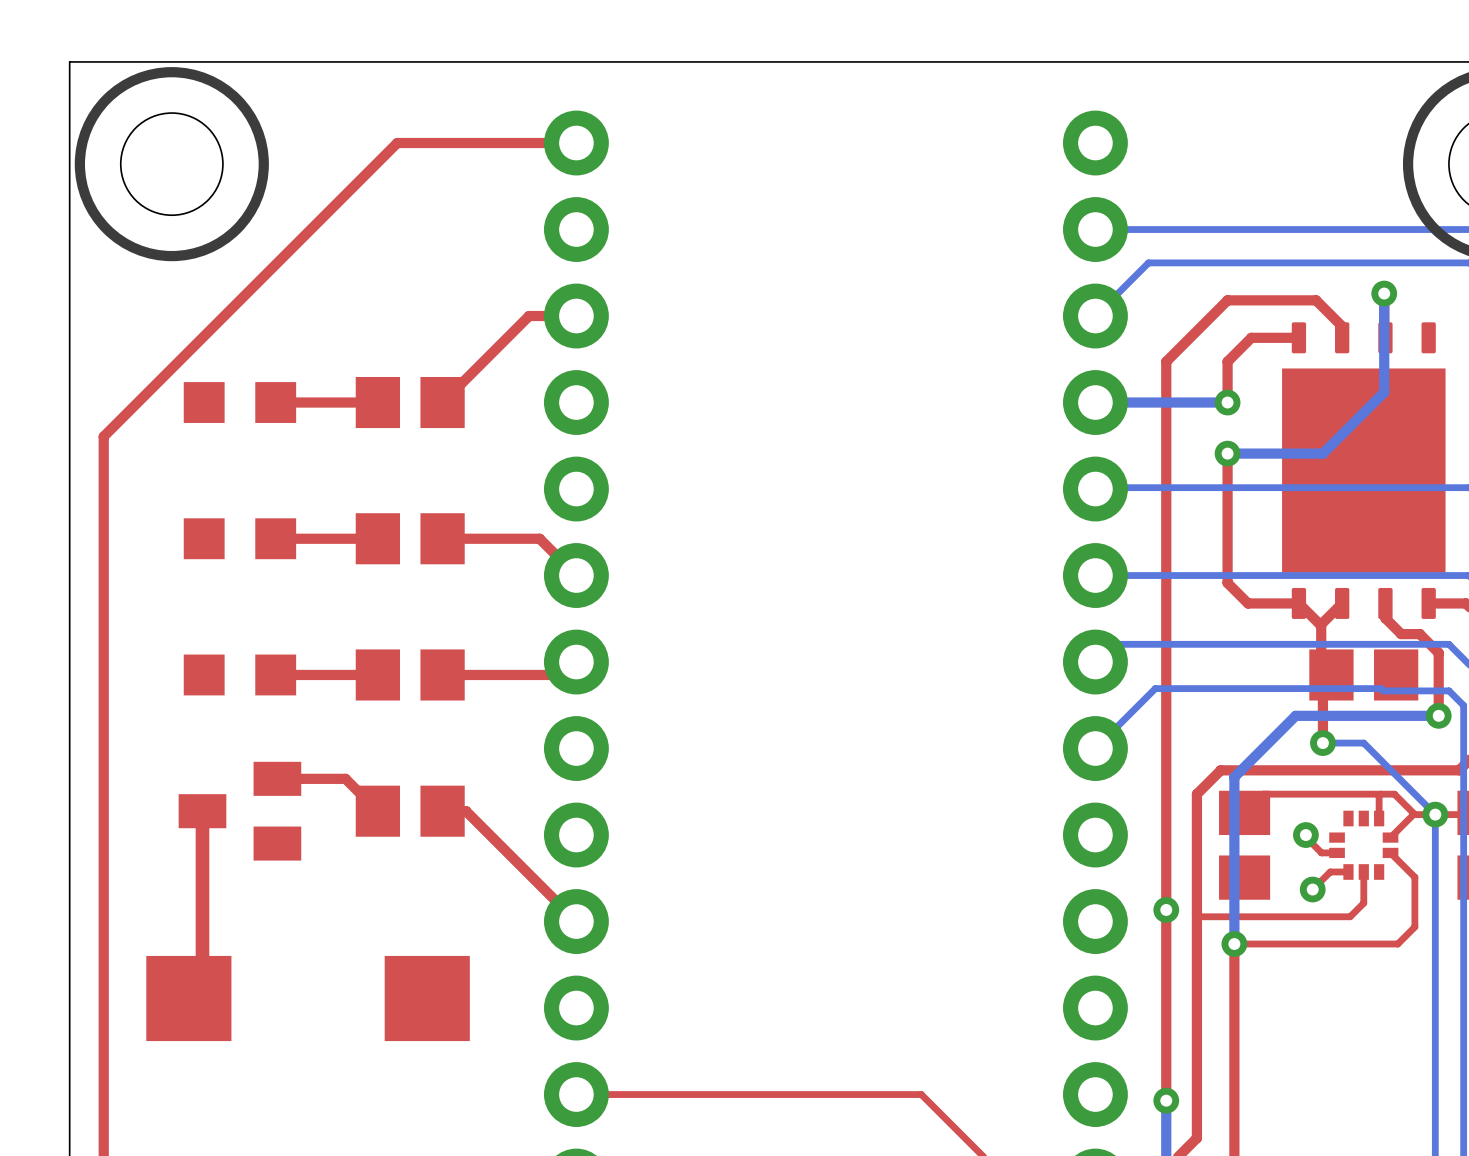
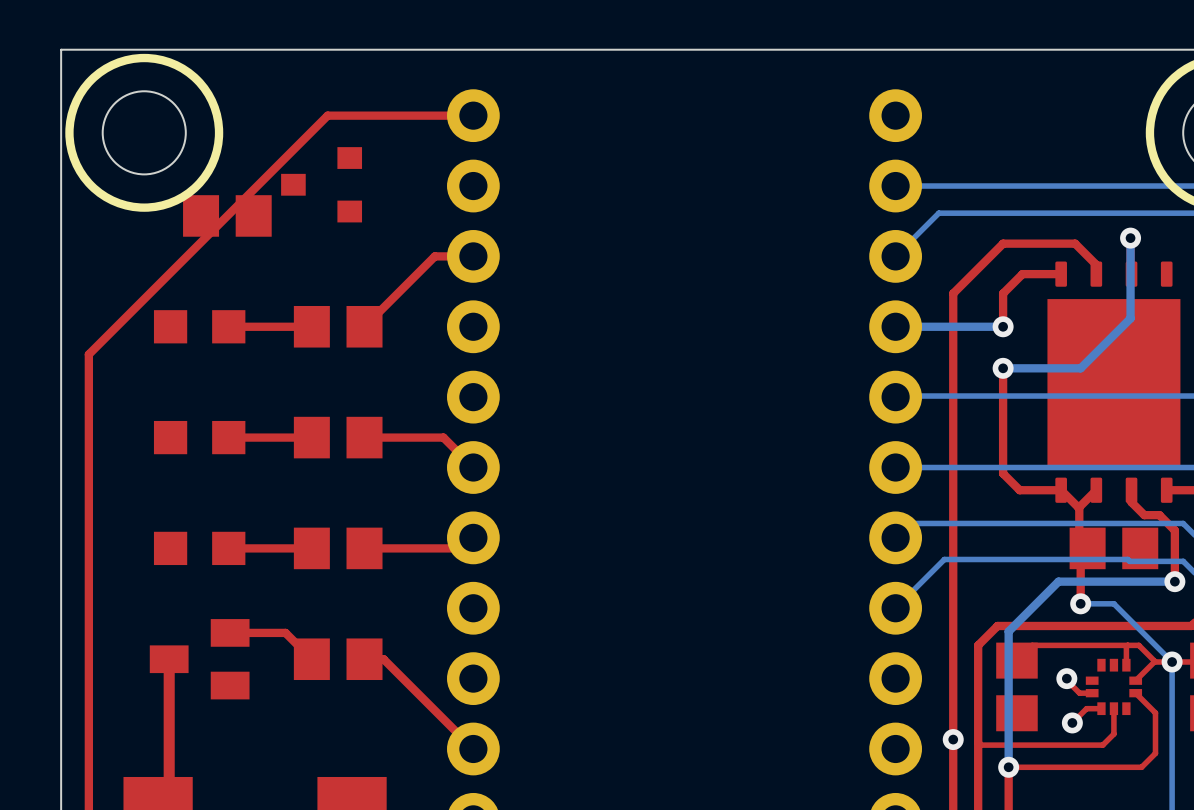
part: none -> (321, 184)
part: none -> (227, 215)

